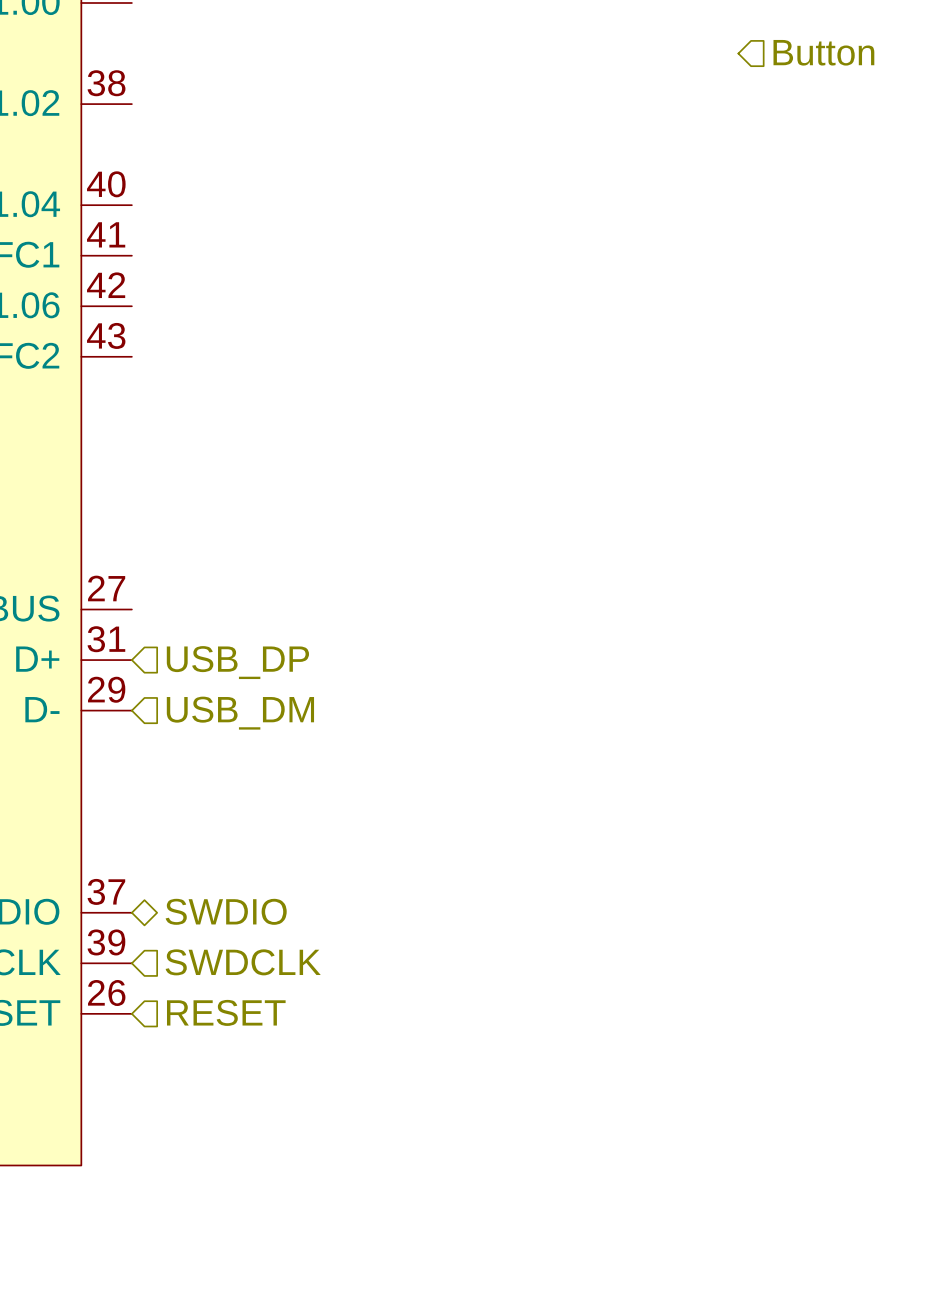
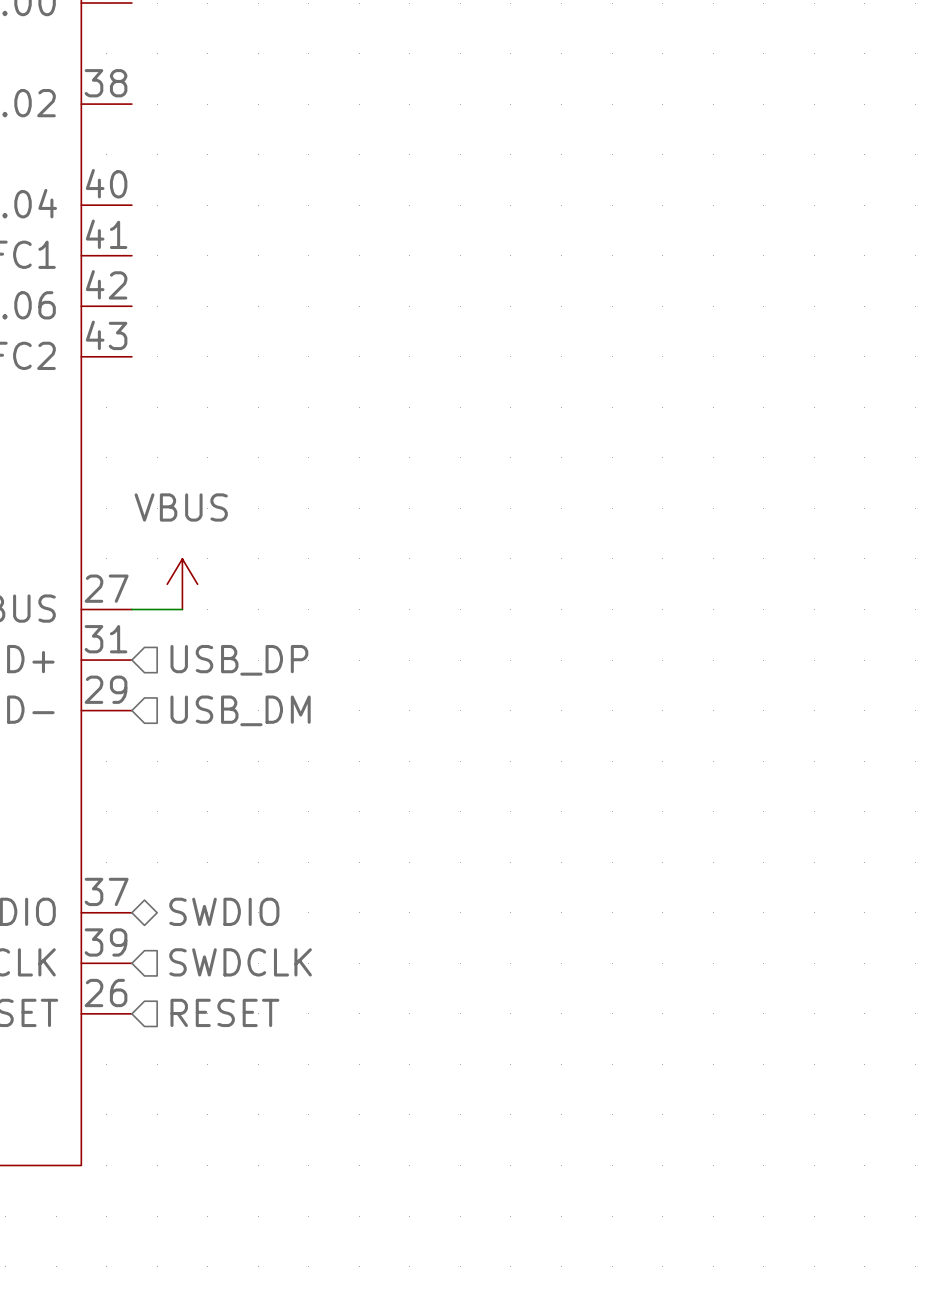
hierarchical label: Button (823, 52) -> none
power symbol: none -> VBUS (182, 584)
wire: none -> (131, 609) (182, 609)

